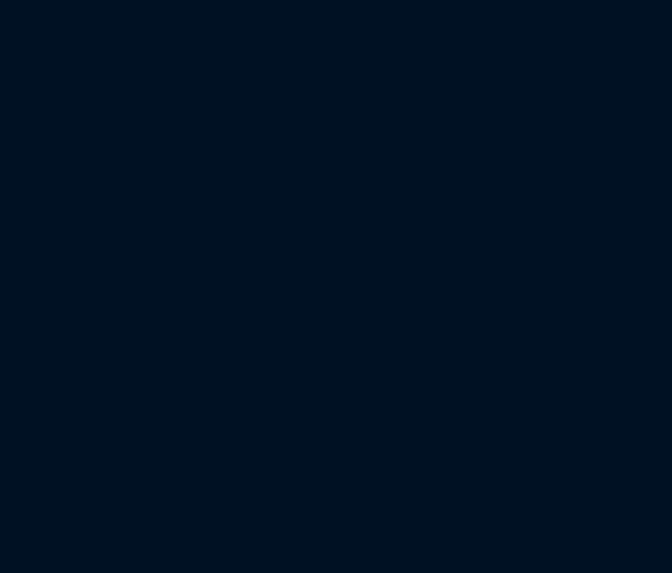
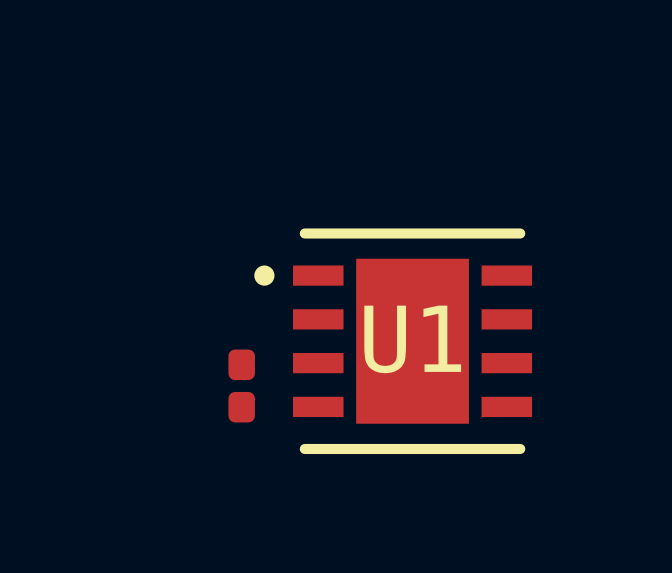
U1: none -> (393, 341)
part: none -> (241, 385)

